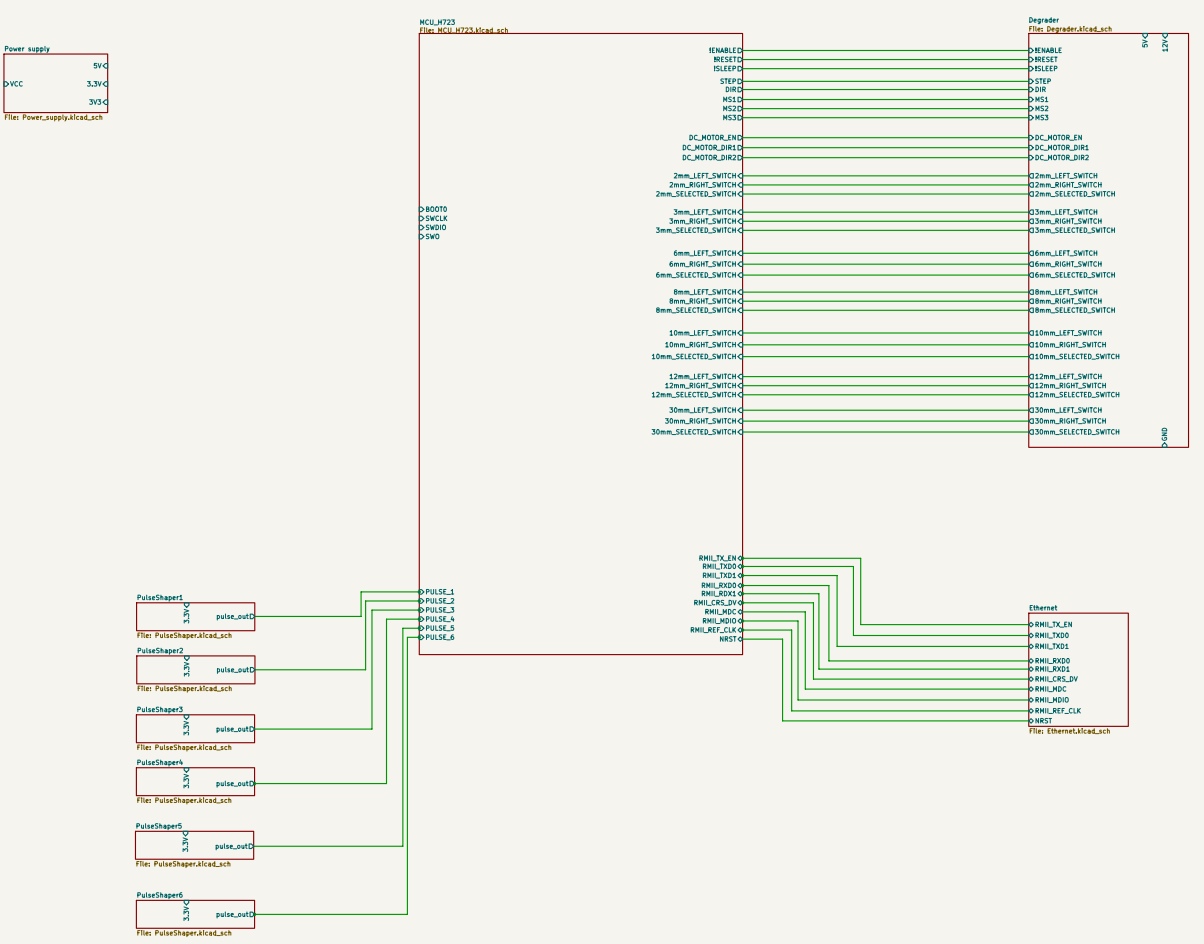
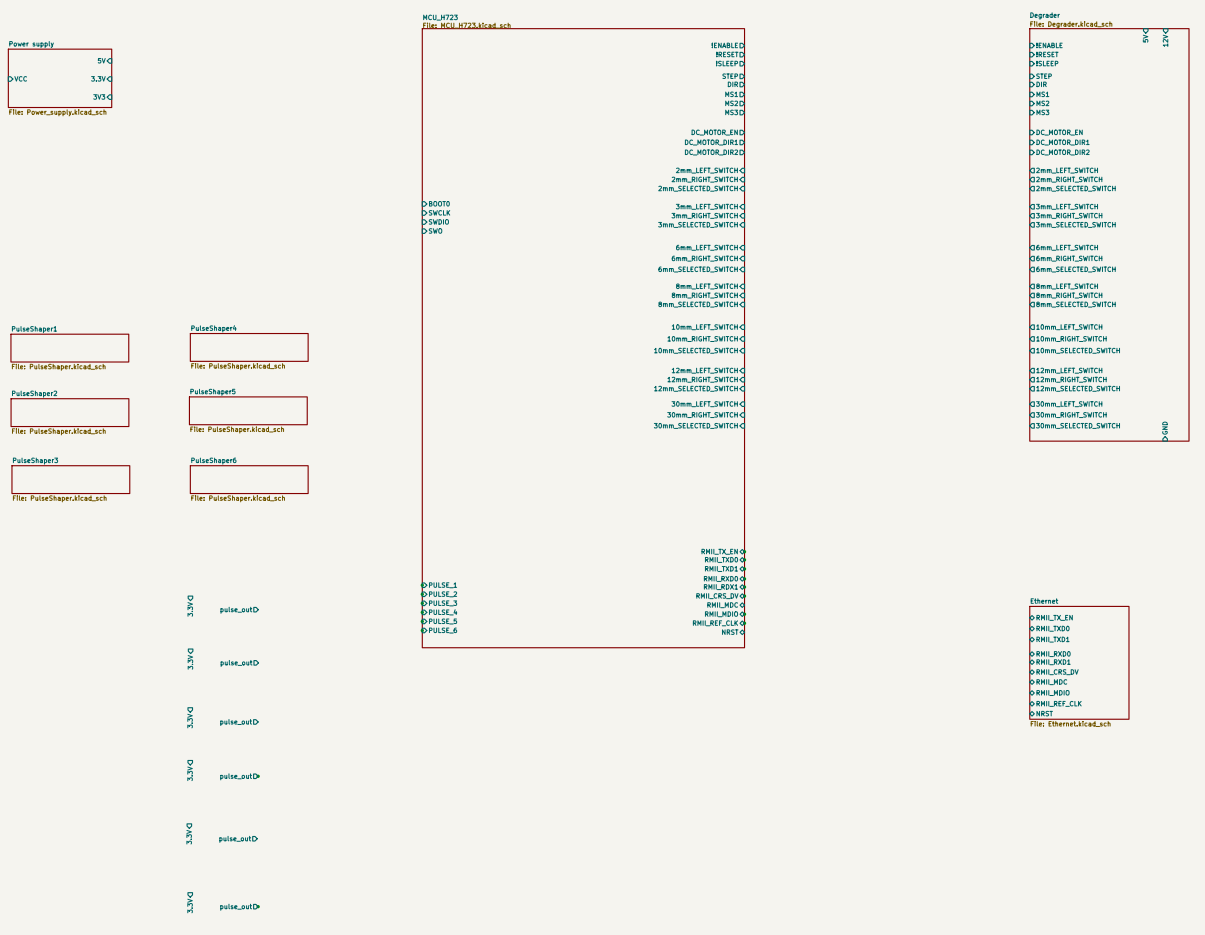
wire: (742, 50) (1028, 50) -> none
wire: (742, 59) (1028, 59) -> none
wire: (742, 68) (1028, 68) -> none
wire: (742, 81) (1028, 81) -> none
wire: (742, 89) (1028, 89) -> none
wire: (742, 99) (1028, 99) -> none
wire: (742, 108) (1028, 108) -> none
wire: (742, 117) (1028, 117) -> none
wire: (742, 137) (1028, 137) -> none
wire: (742, 147) (1028, 147) -> none
wire: (742, 157) (1028, 157) -> none
wire: (742, 175) (1028, 175) -> none
wire: (742, 184) (1028, 184) -> none
wire: (742, 194) (1028, 194) -> none
wire: (742, 212) (1028, 212) -> none
wire: (742, 221) (1028, 221) -> none
wire: (742, 230) (1028, 230) -> none
wire: (742, 253) (1028, 253) -> none
wire: (742, 264) (1028, 264) -> none
wire: (742, 275) (1028, 275) -> none
wire: (742, 292) (1028, 292) -> none
wire: (742, 301) (1028, 301) -> none
wire: (742, 310) (1028, 310) -> none
wire: (742, 333) (1028, 333) -> none
wire: (742, 344) (1028, 344) -> none
wire: (742, 356) (1028, 356) -> none
wire: (742, 376) (1028, 376) -> none
wire: (742, 385) (1028, 385) -> none
wire: (742, 394) (1028, 394) -> none
wire: (742, 410) (1028, 410) -> none
wire: (742, 421) (1028, 421) -> none
wire: (742, 432) (1028, 432) -> none
wire: (742, 558) (860, 558) (860, 624) (1028, 624) -> none
wire: (742, 566) (853, 566) (853, 635) (1028, 635) -> none
wire: (742, 575) (837, 575) (837, 646) (1028, 646) -> none
wire: (742, 585) (828, 585) (828, 660) (1028, 660) -> none
wire: (419, 591) (361, 591) (361, 616) (254, 616) -> none
wire: (742, 593) (818, 593) (818, 669) (1028, 669) -> none
wire: (419, 600) (365, 600) (365, 669) (254, 669) -> none
wire: (742, 602) (813, 602) (813, 679) (1028, 679) -> none
wire: (419, 610) (371, 610) (371, 729) (254, 729) -> none
wire: (742, 611) (805, 611) (805, 689) (1028, 689) -> none
sheet position: (195, 616) -> (69, 348)
wire: (419, 619) (386, 619) (386, 783) (254, 783) -> none
wire: (742, 620) (798, 620) (798, 700) (1028, 700) -> none
wire: (419, 628) (402, 628) (402, 846) (253, 846) -> none
wire: (742, 630) (791, 630) (791, 710) (1028, 710) -> none
wire: (419, 637) (407, 637) (407, 914) (254, 914) -> none
wire: (742, 639) (782, 639) (782, 720) (1028, 720) -> none
sheet position: (195, 669) -> (69, 412)
sheet position: (195, 728) -> (70, 479)
sheet position: (195, 781) -> (249, 347)
sheet position: (194, 845) -> (248, 410)
sheet position: (195, 914) -> (249, 479)

